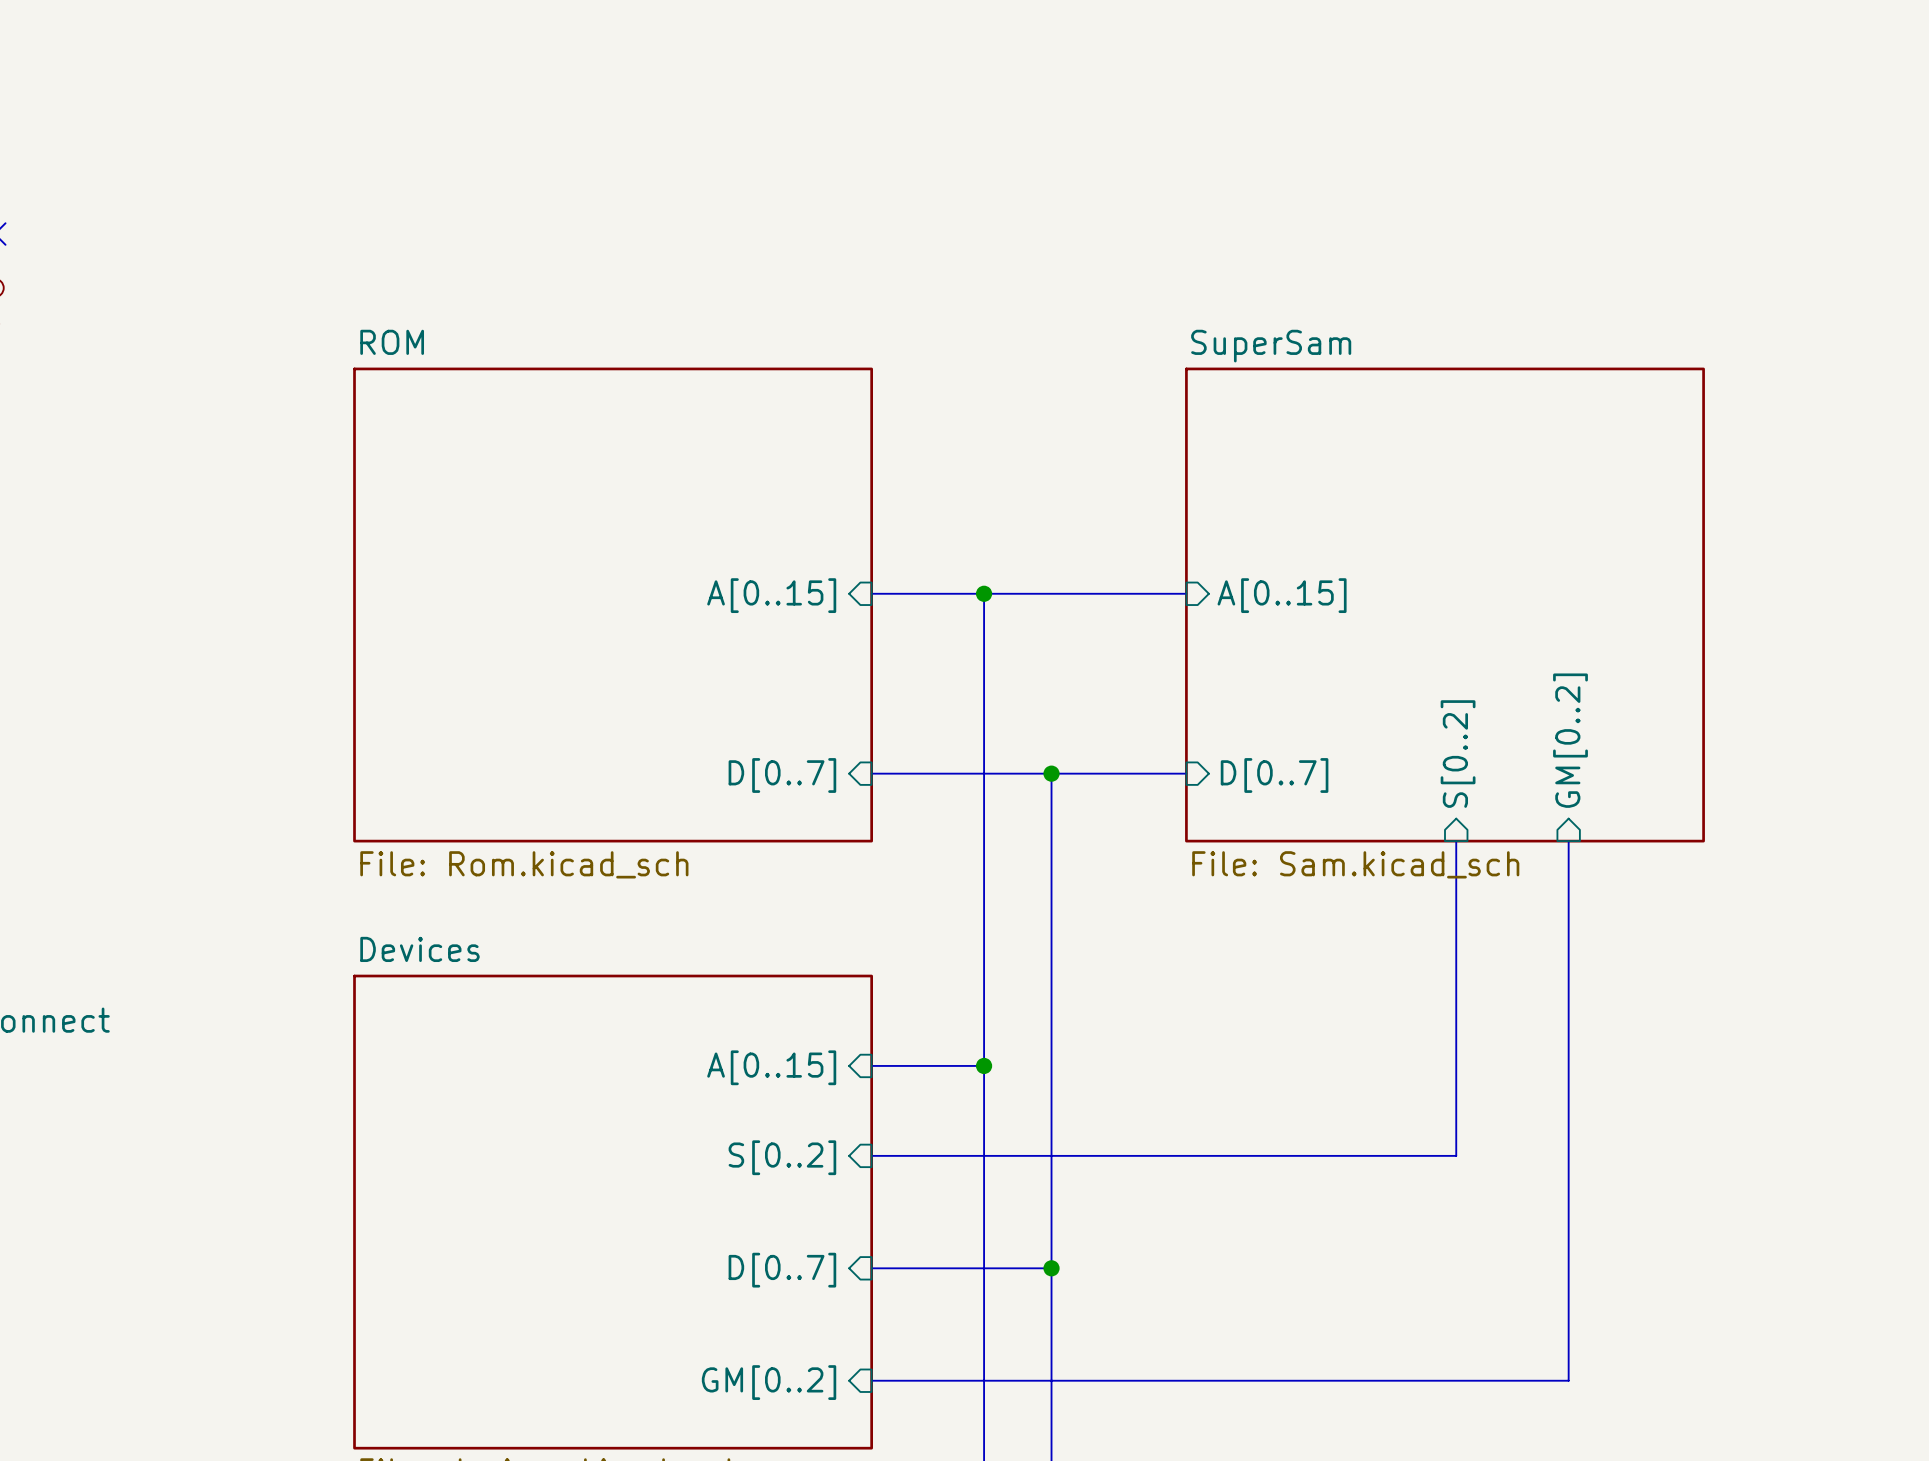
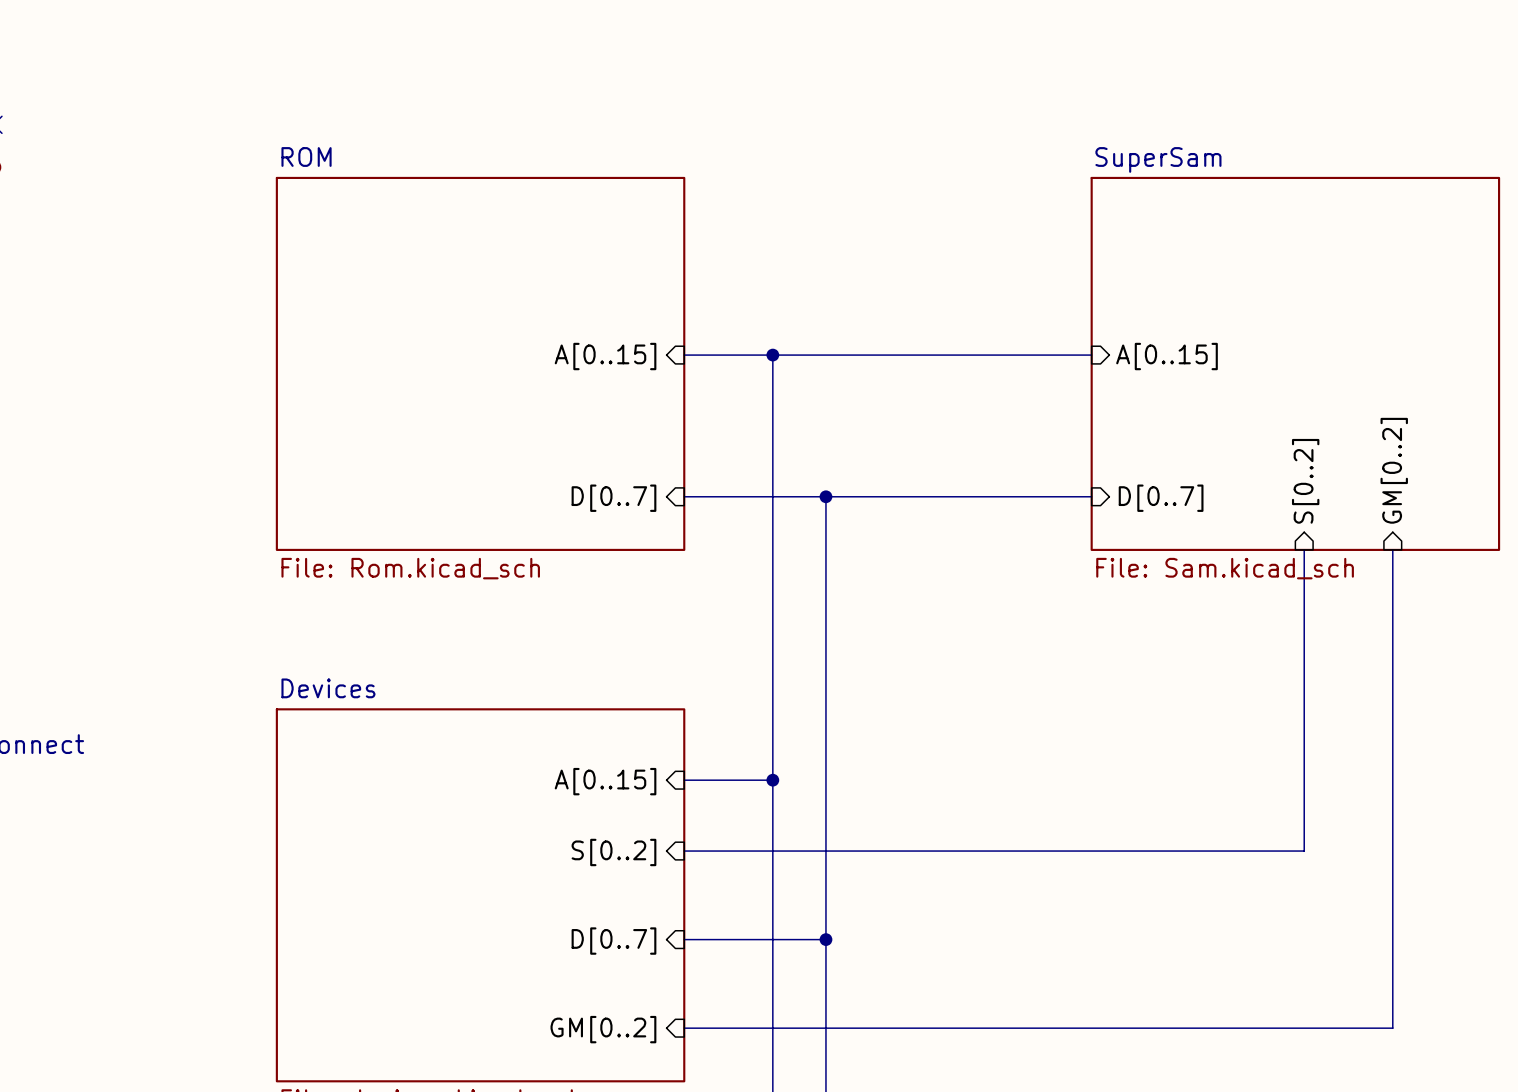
bus: none -> (684, 355) (1091, 355)
bus: none -> (772, 355) (772, 408)
junction: none -> (772, 355)
sheet pin: none -> A[0..15] (1167, 356)
bus: (871, 593) (1186, 593) -> none
junction: (984, 593) -> none
sheet pin position: A[0..15] (771, 595) -> A[0..15] (605, 356)
sheet pin: A[0..15] (1282, 595) -> none
sheet ROM position: (613, 605) -> (480, 363)
sheet SuperSam position: (1444, 605) -> (1295, 363)
bus: none -> (684, 496) (1091, 496)
bus: none -> (825, 496) (825, 549)
junction: none -> (825, 496)
sheet pin: none -> D[0..7] (1161, 498)
sheet pin position: GM[0..2] (1570, 740) -> GM[0..2] (1394, 470)
sheet pin position: S[0..2] (1458, 754) -> S[0..2] (1305, 481)
bus: (871, 773) (1186, 773) -> none
junction: (1051, 773) -> none
sheet pin position: D[0..7] (782, 775) -> D[0..7] (613, 498)
sheet pin: D[0..7] (1274, 775) -> none
bus: (1456, 841) (1456, 1155) -> (1304, 549) (1304, 851) (1144, 851)
bus: (1568, 841) (1568, 1380) -> (1392, 549) (1392, 1028) (1233, 1028)

